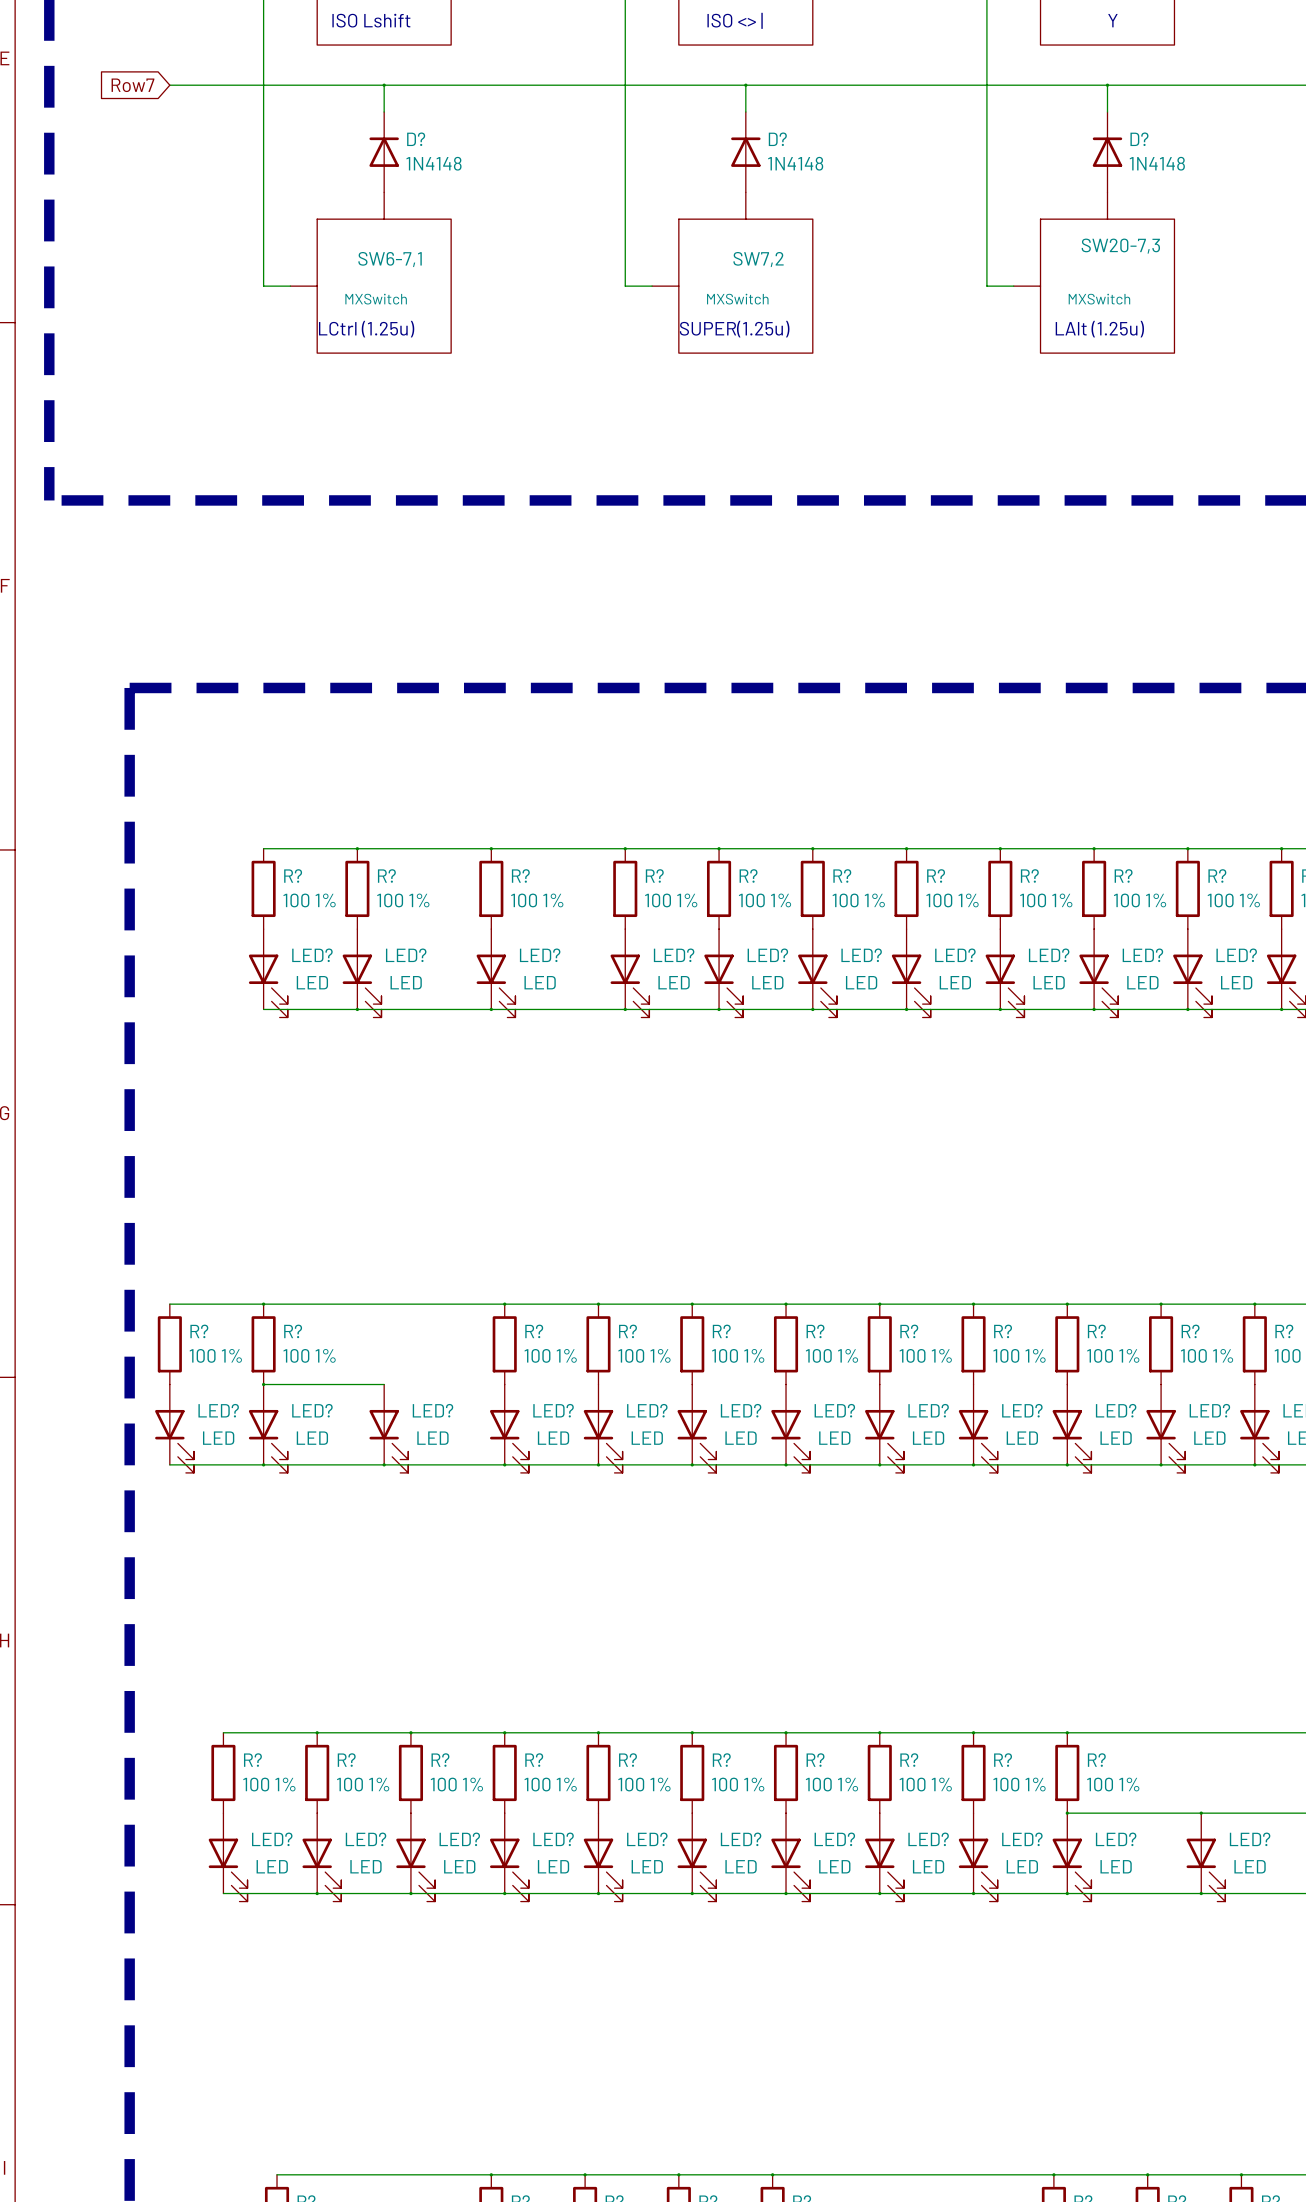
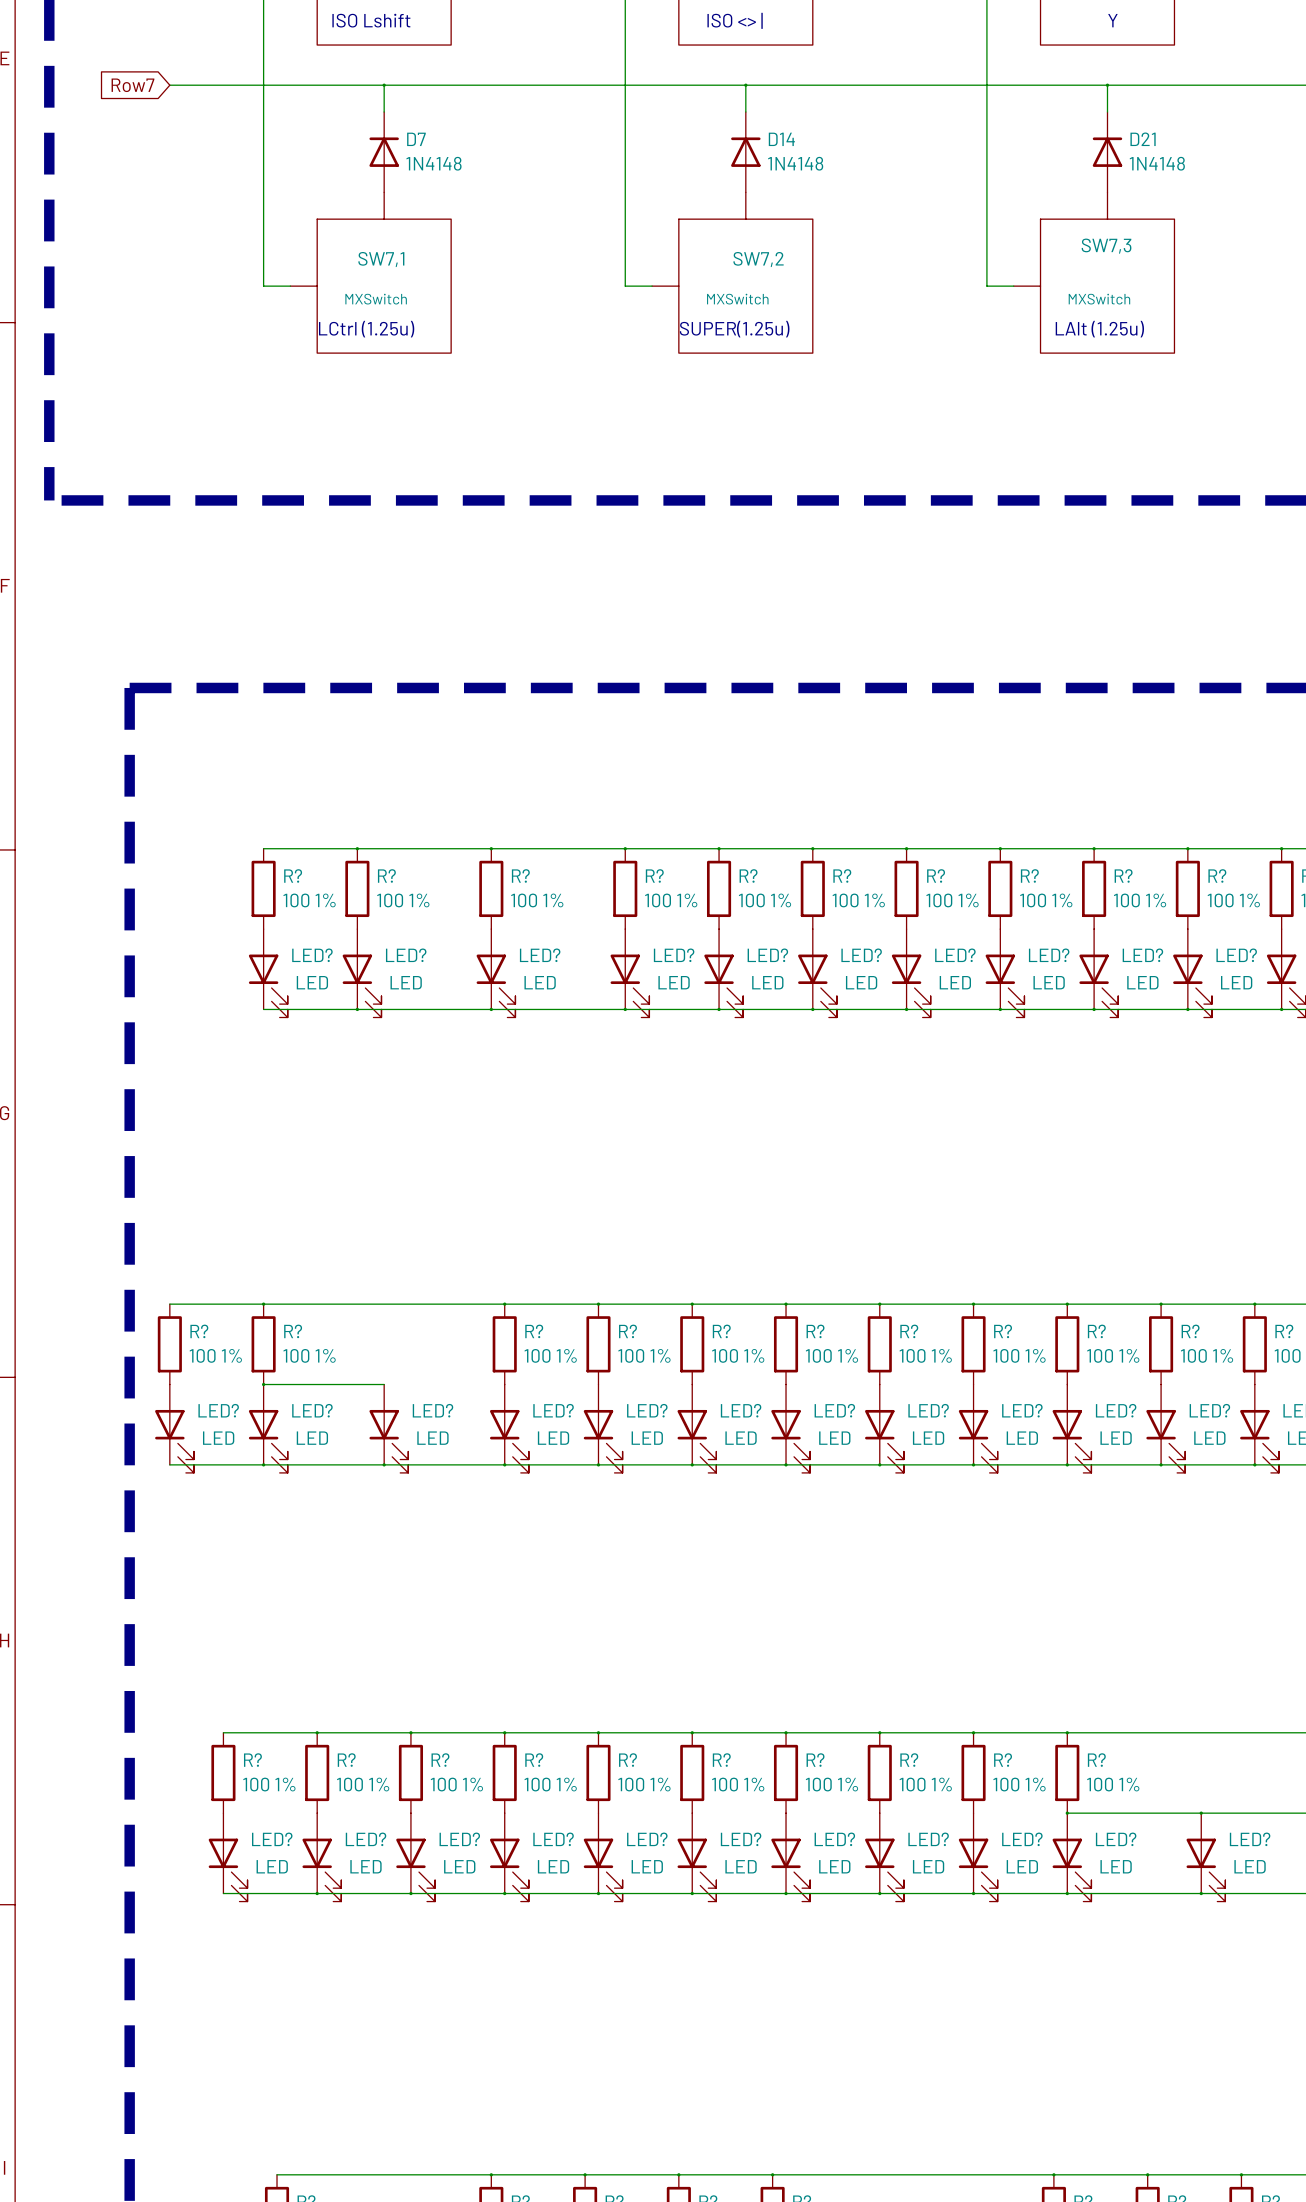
D? name: D? (416, 139) -> D7 (416, 139)
D? name: D? (777, 139) -> D14 (781, 139)
D? name: D? (1139, 139) -> D21 (1143, 139)
SW20-7,3 name: SW20-7,3 (1120, 246) -> SW7,3 (1106, 246)
SW6-7,1 name: SW6-7,1 (390, 259) -> SW7,1 (381, 259)

